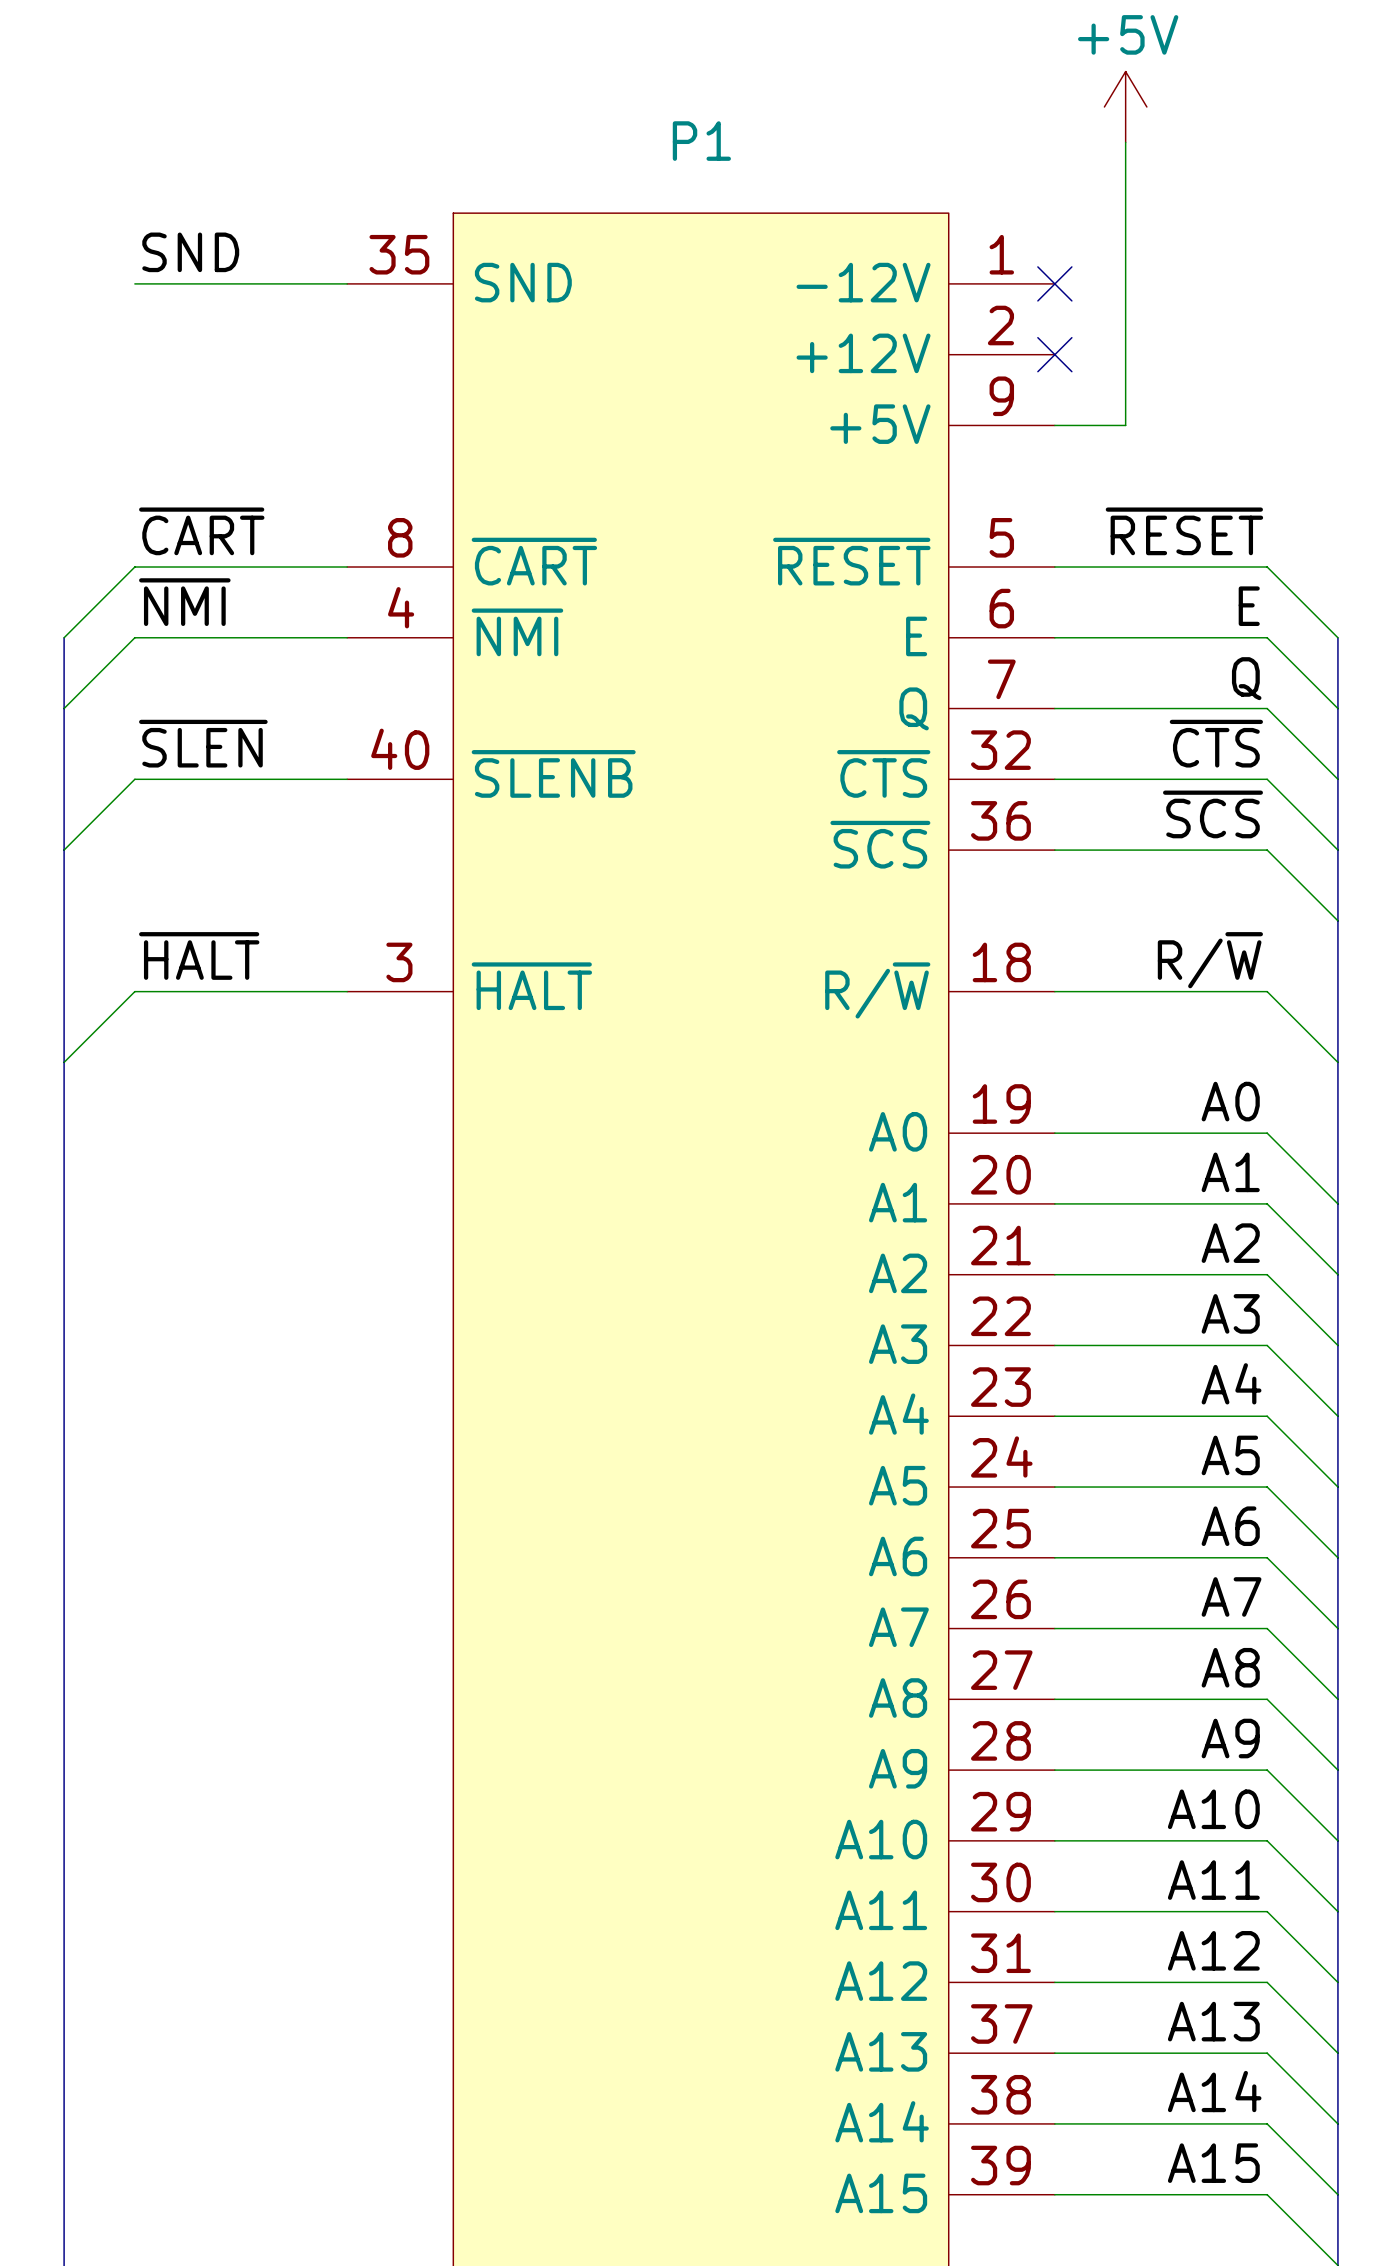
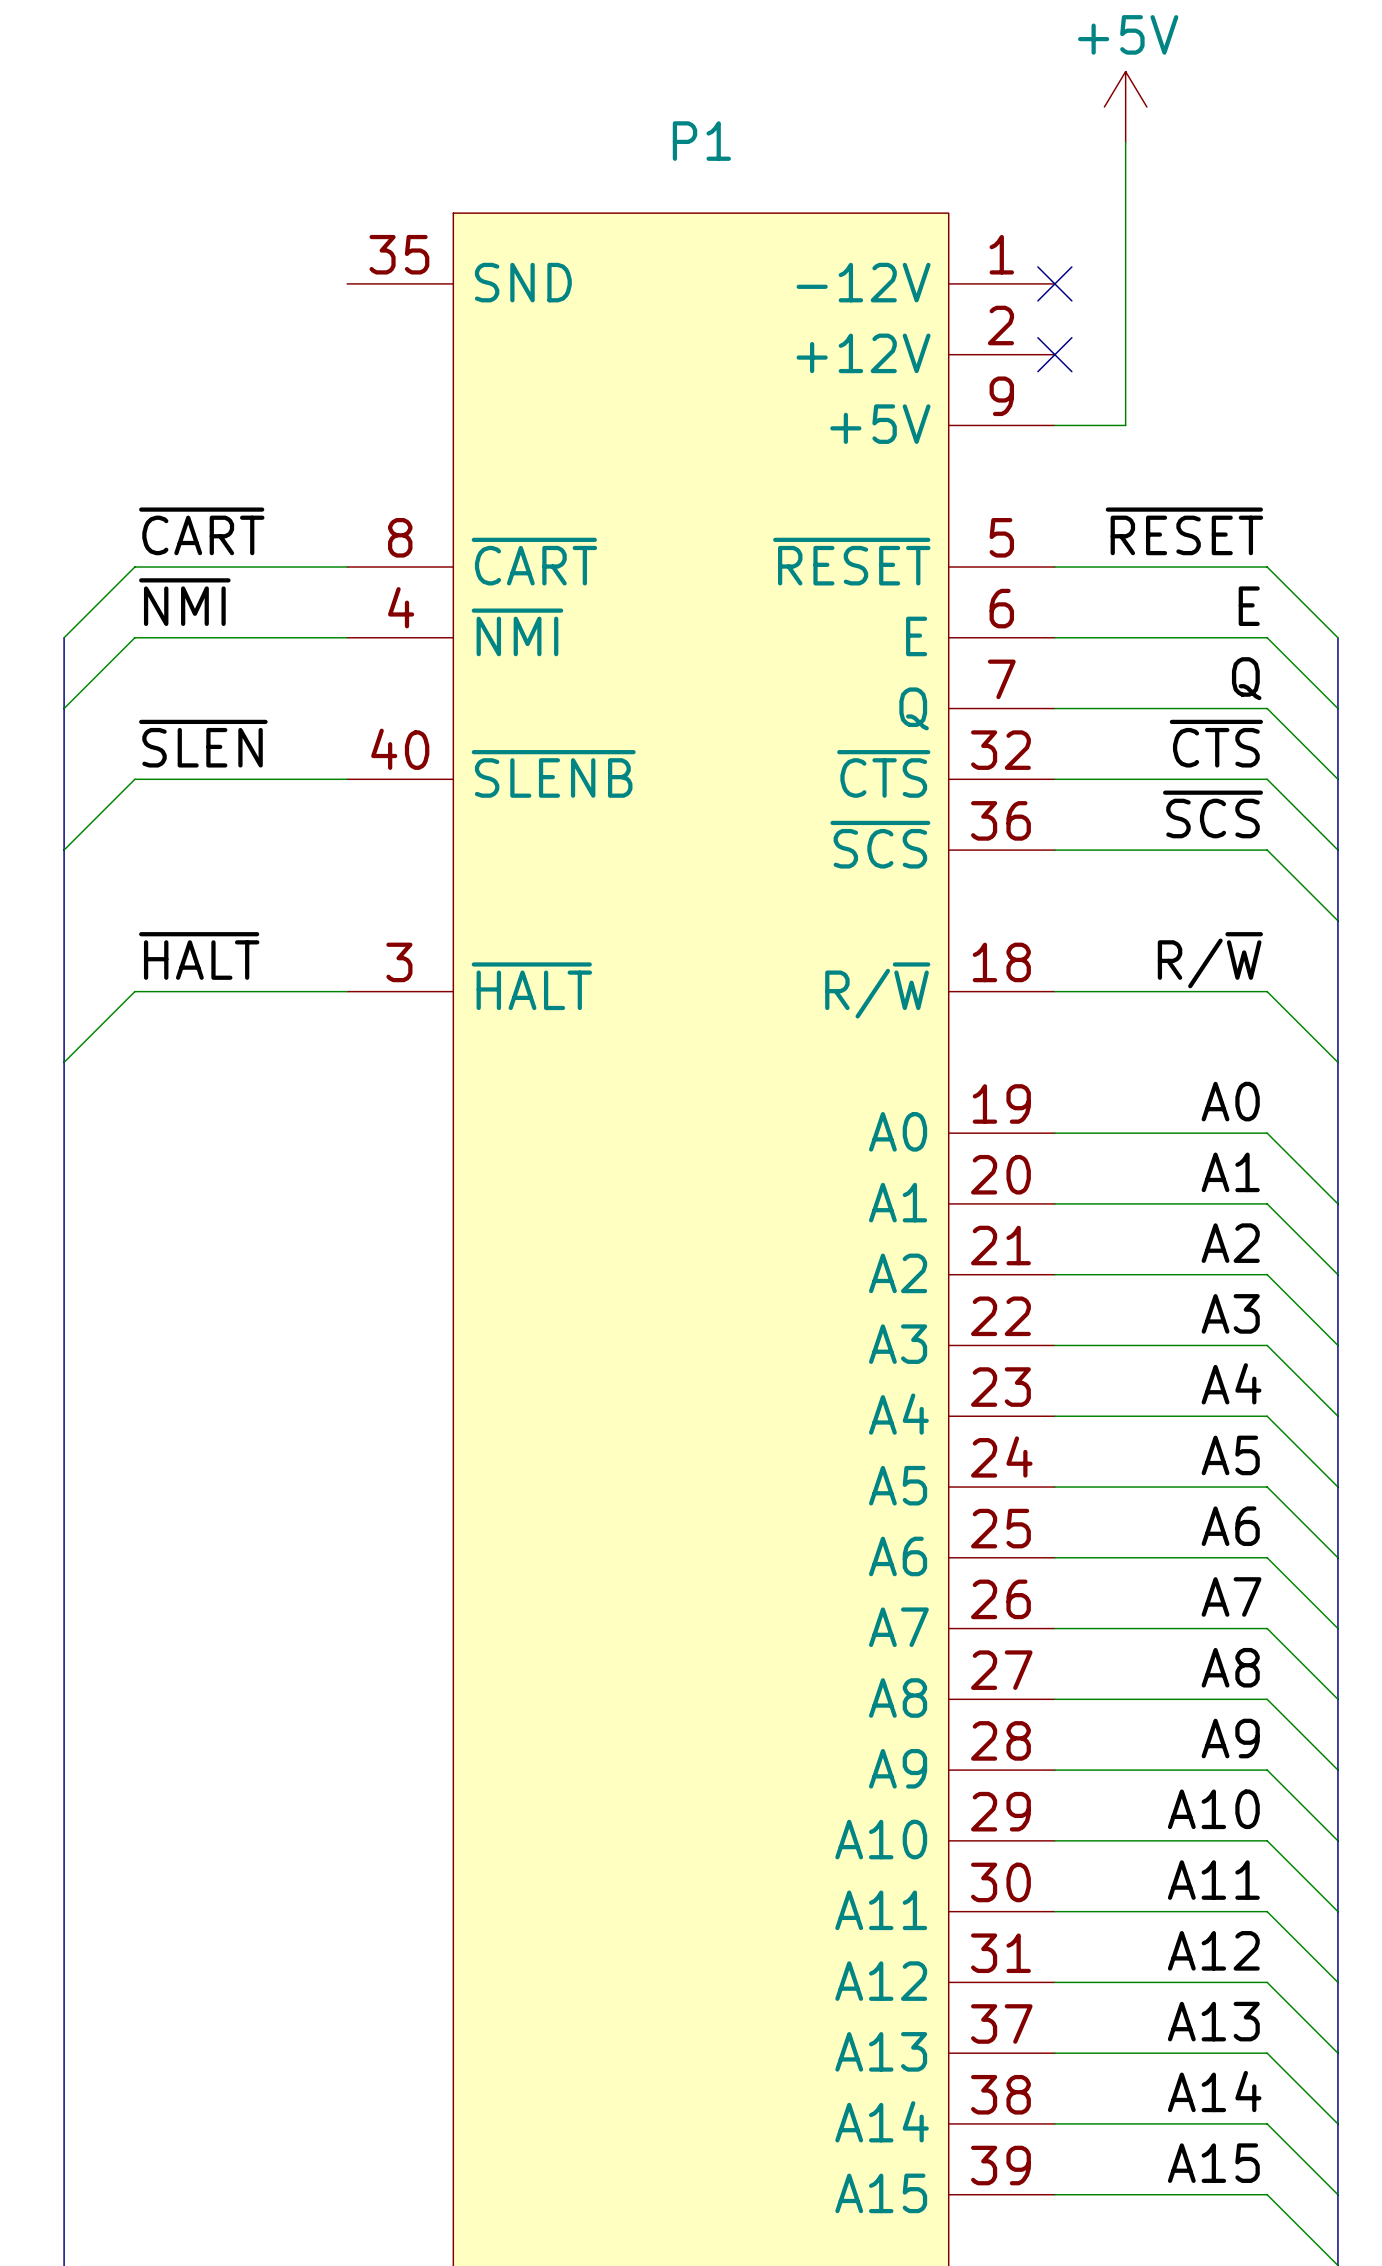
label: SND (190, 252) -> none
wire: (134, 283) (347, 283) -> none

